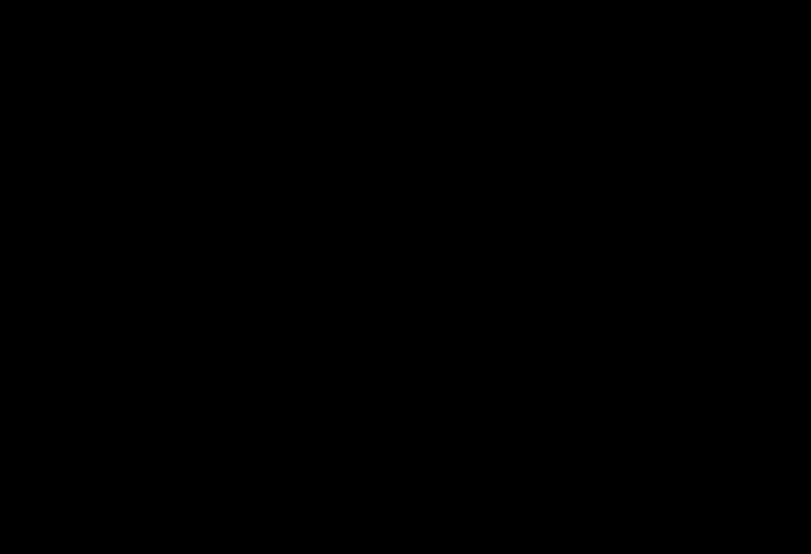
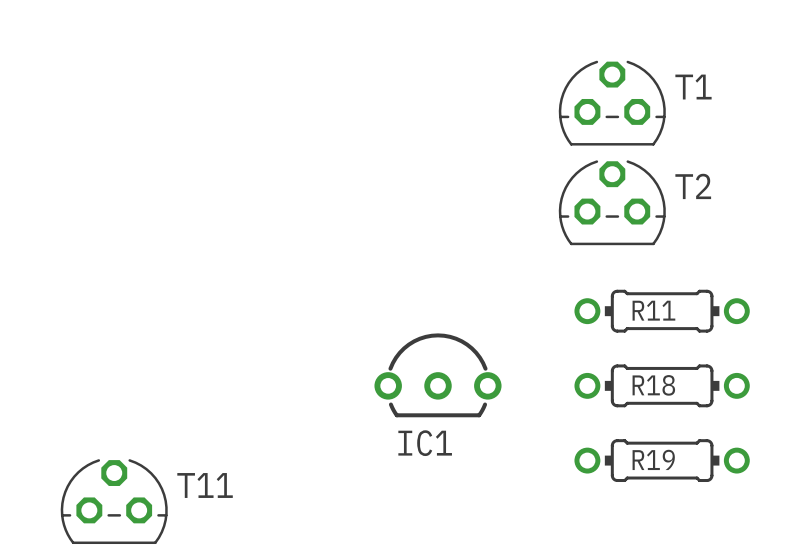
T1: none -> (612, 103)
T2: none -> (612, 202)
R11: none -> (662, 311)
IC1: none -> (438, 375)
R18: none -> (662, 385)
R19: none -> (662, 460)
T11: none -> (114, 501)

